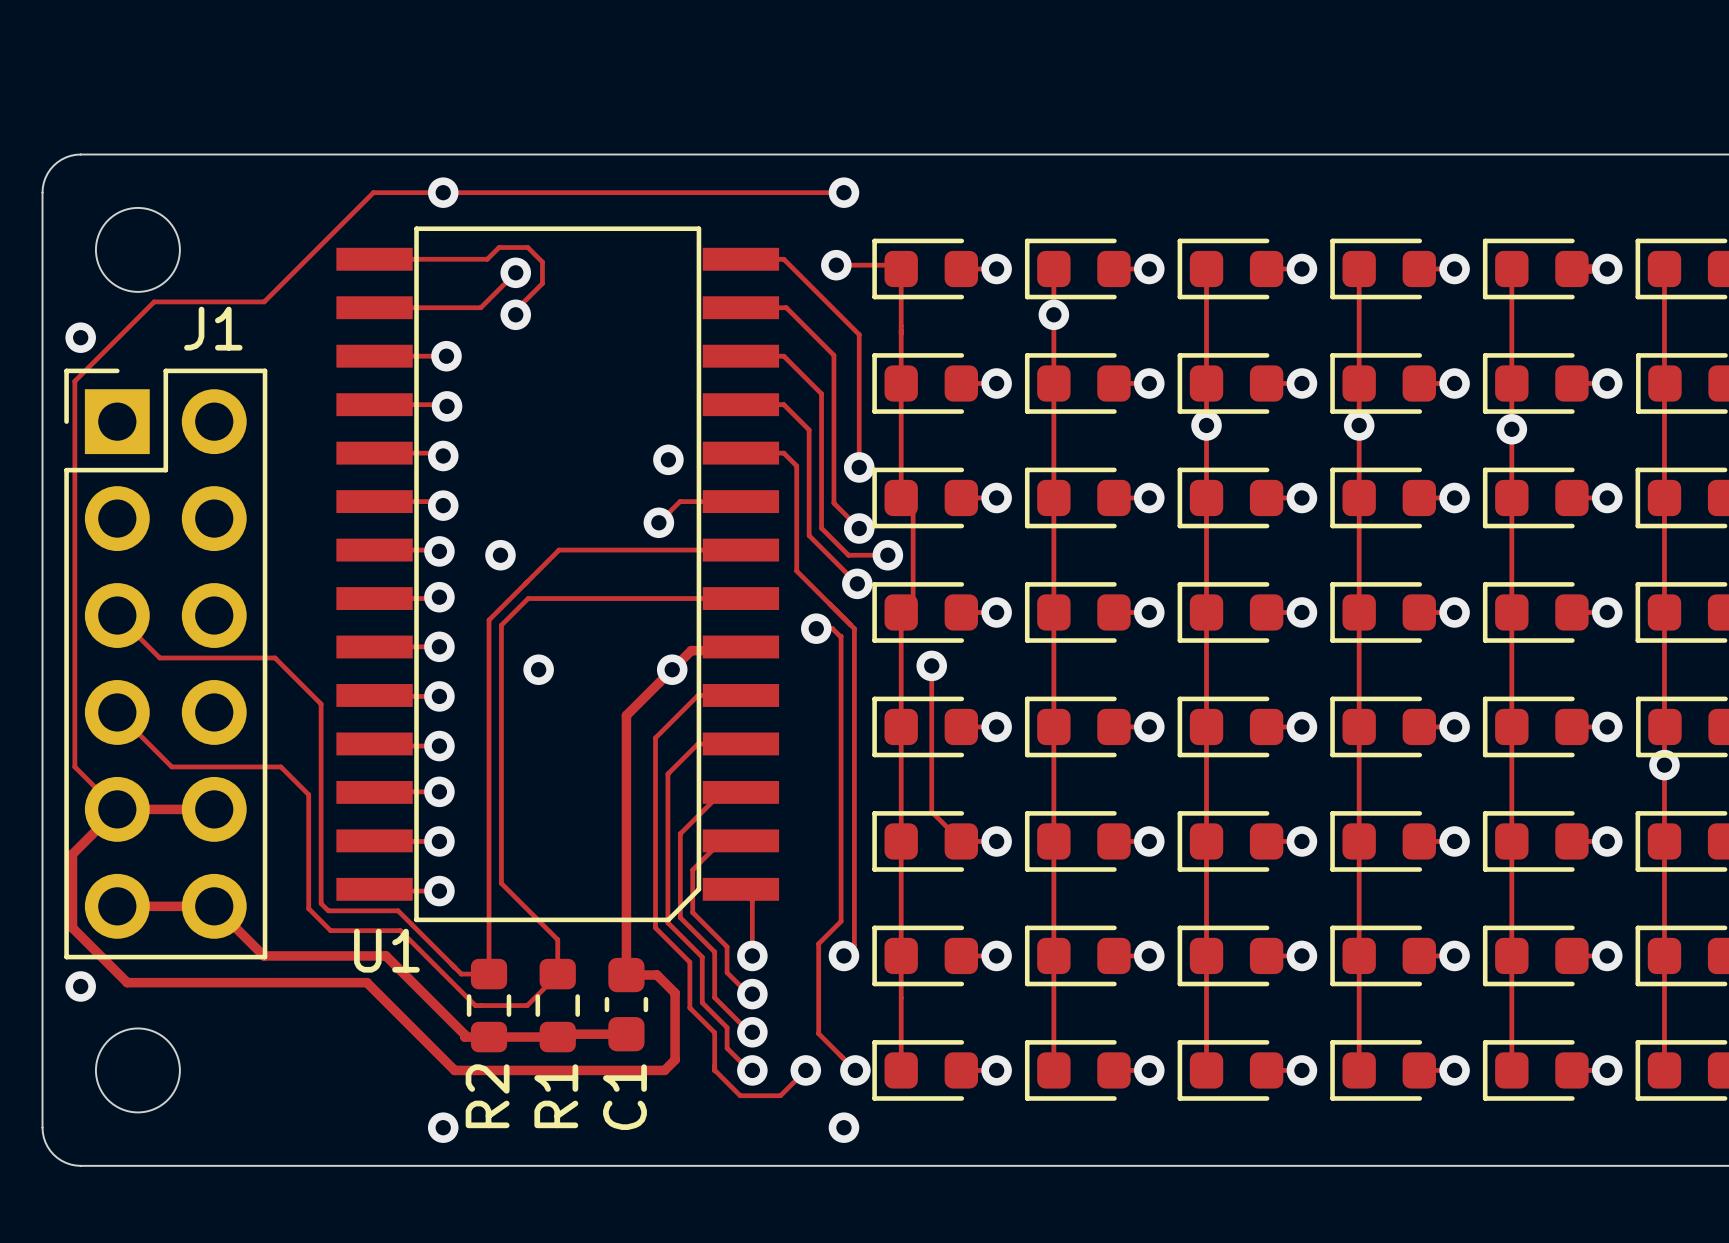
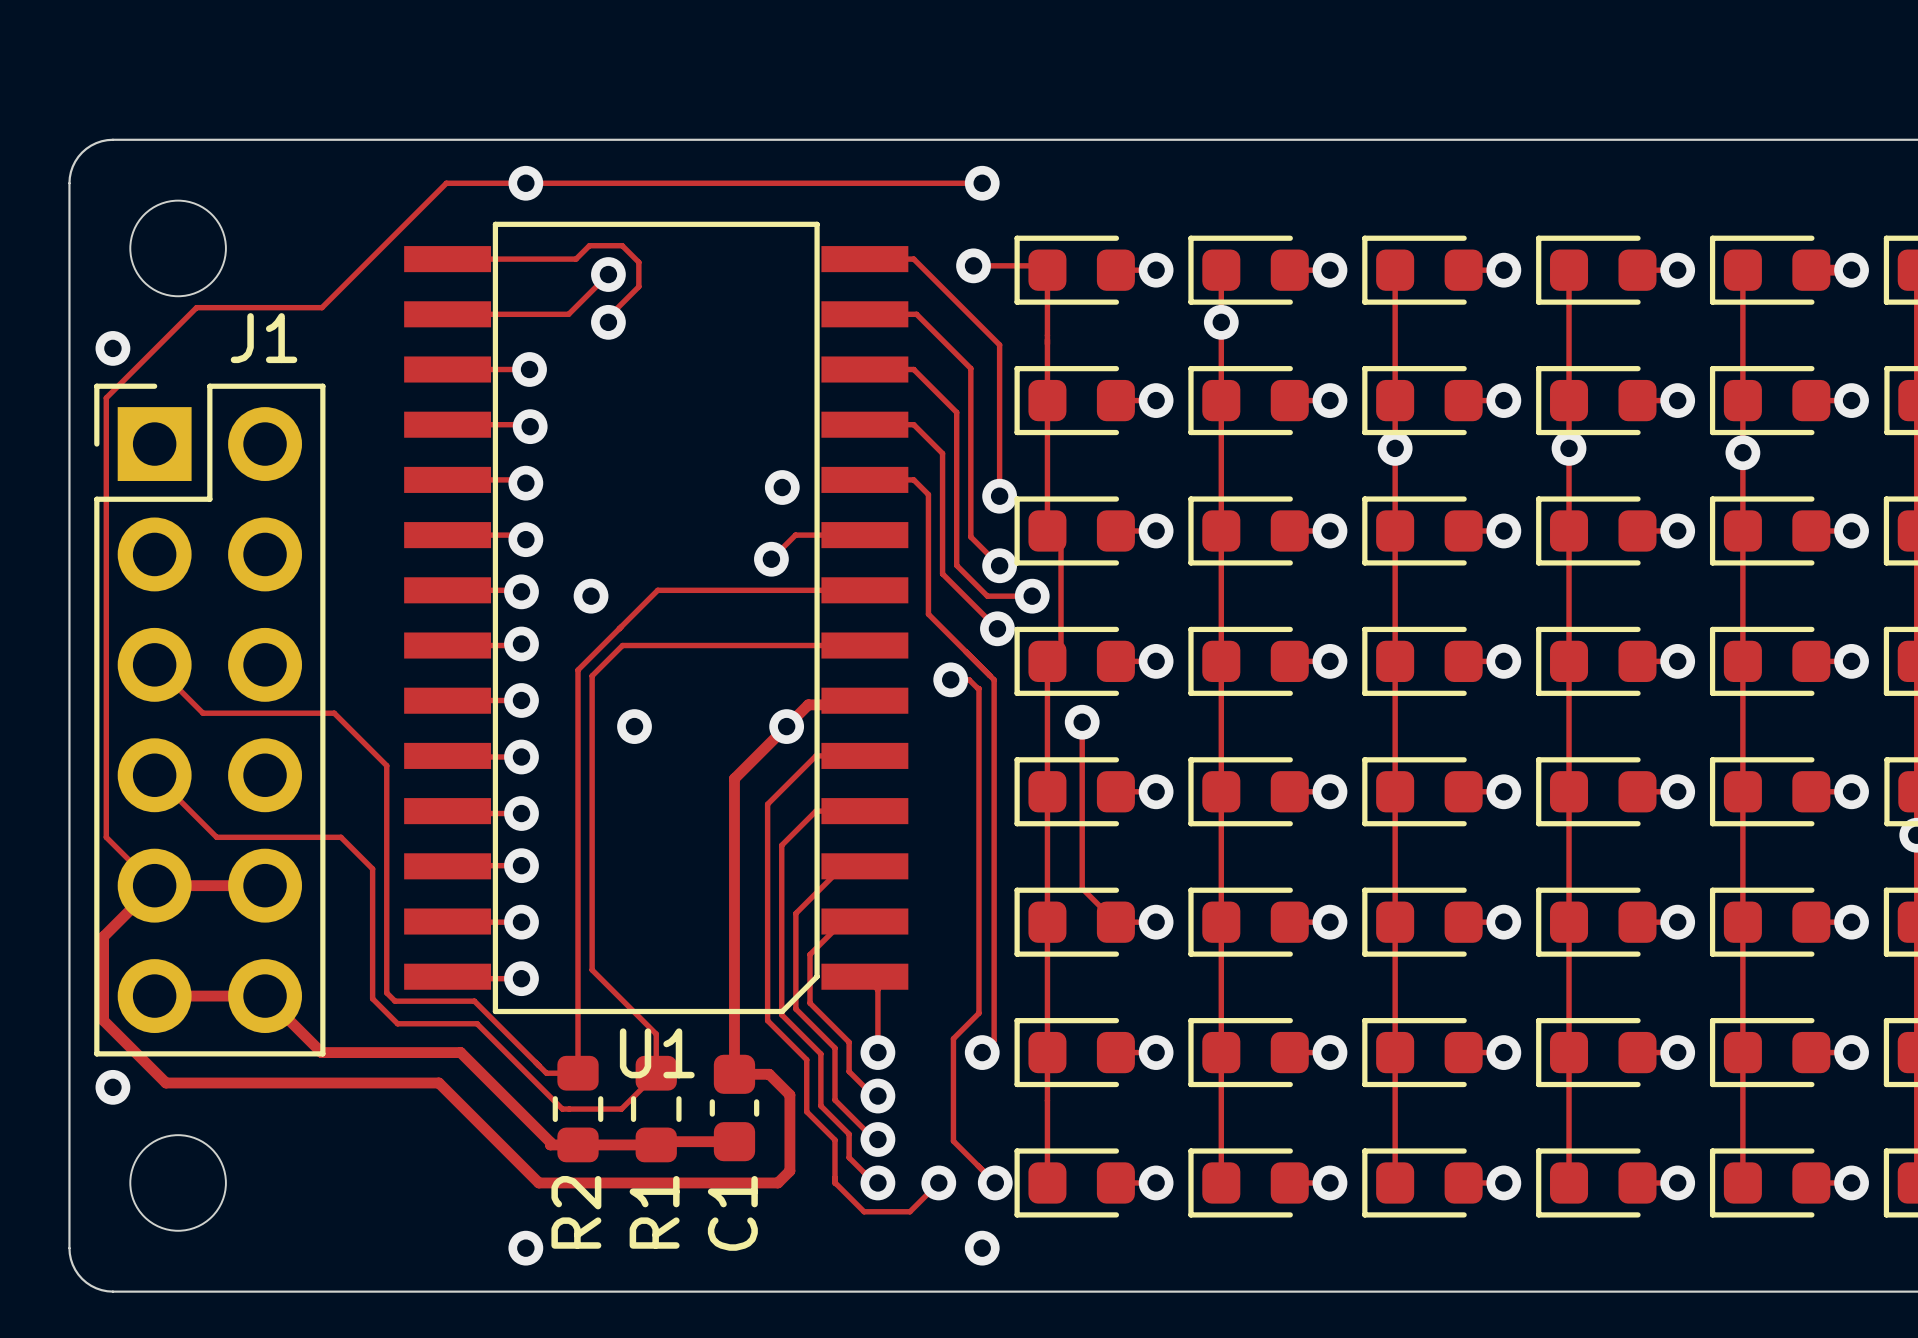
U1 name position: U1 (386, 950) -> U1 (657, 1053)

